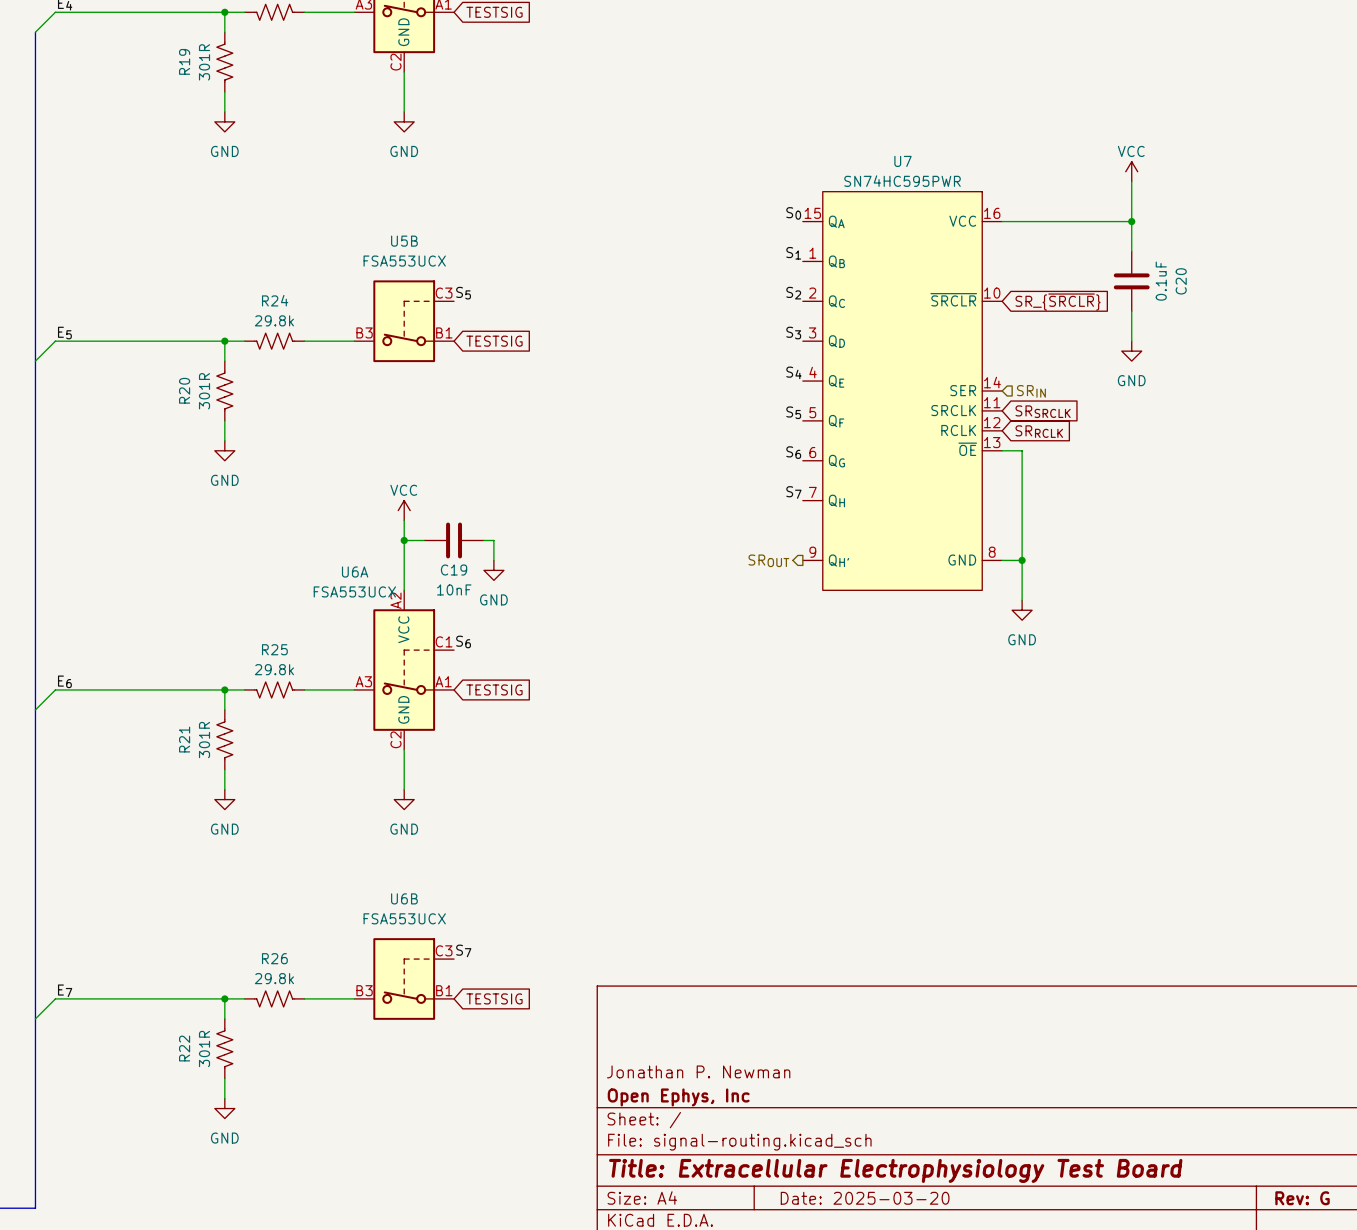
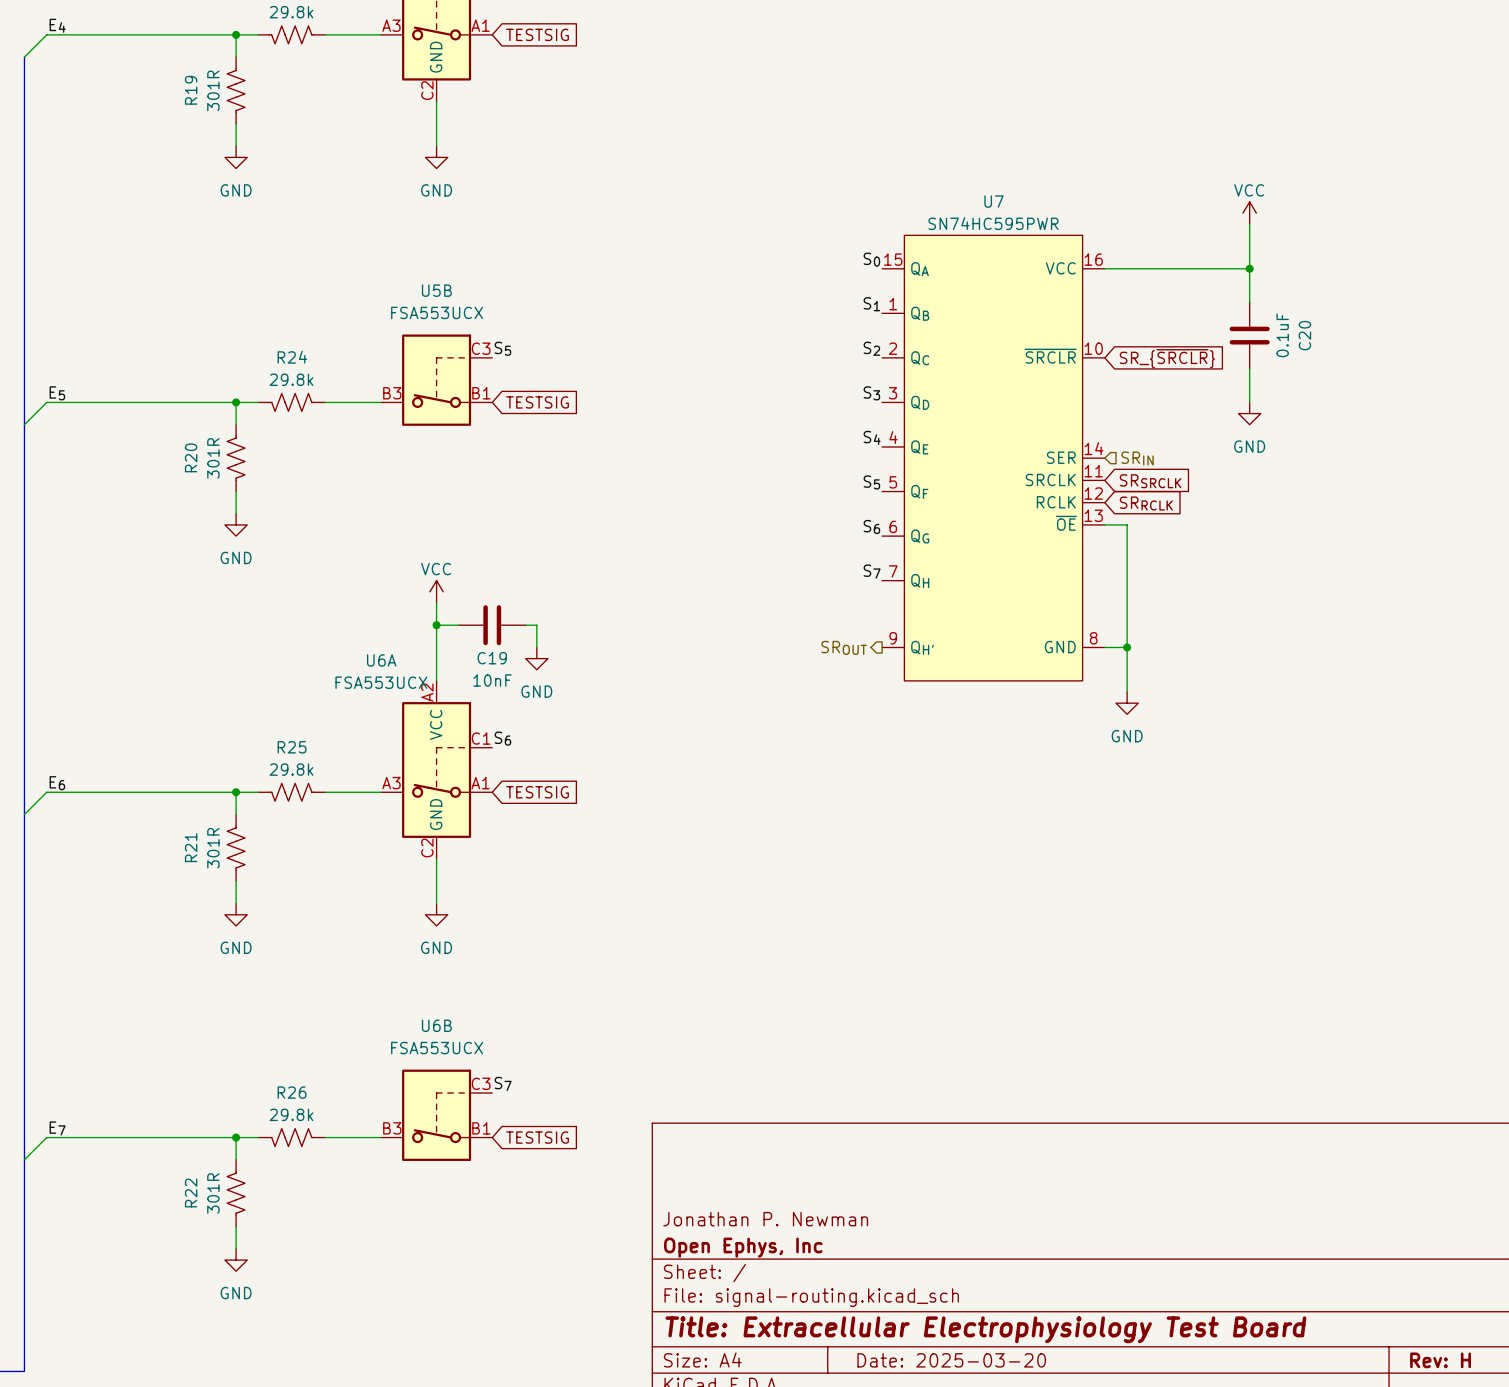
title block: Rev: G (1302, 1198) -> Rev: H (1440, 1360)

